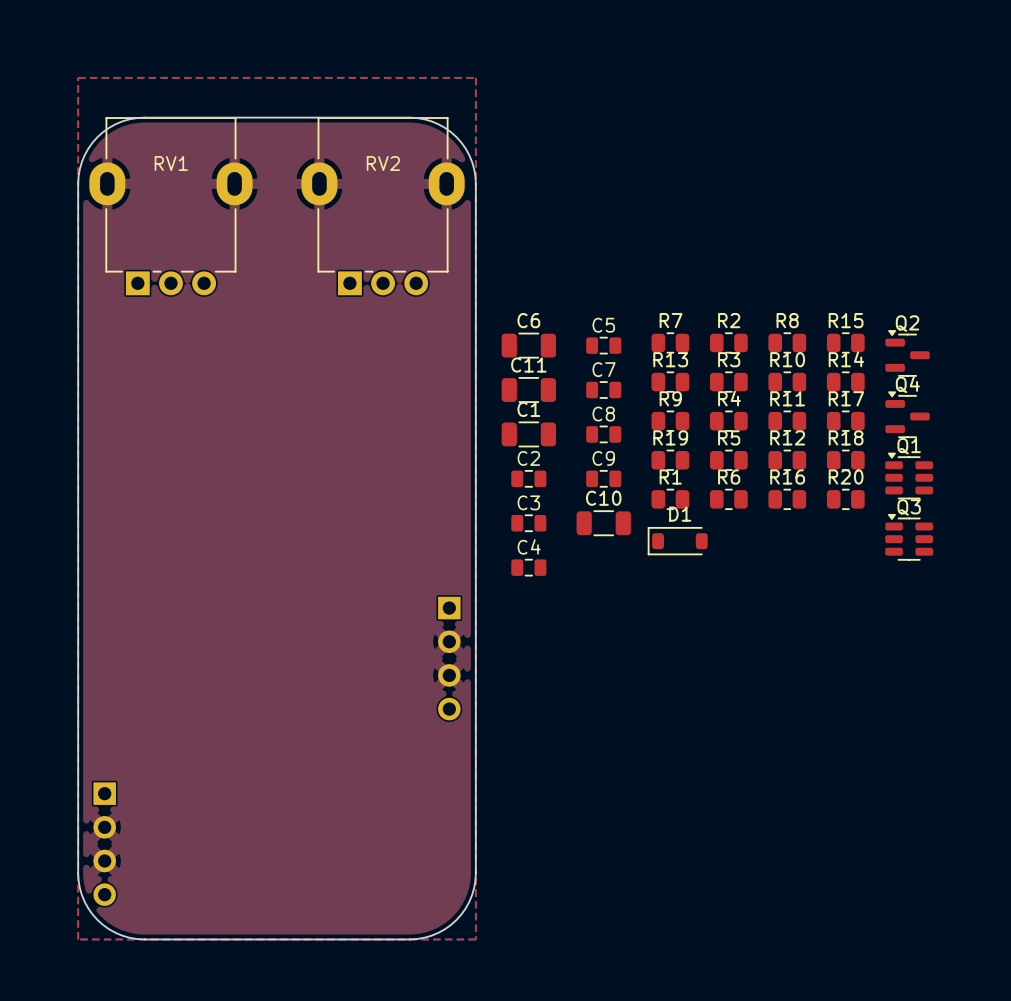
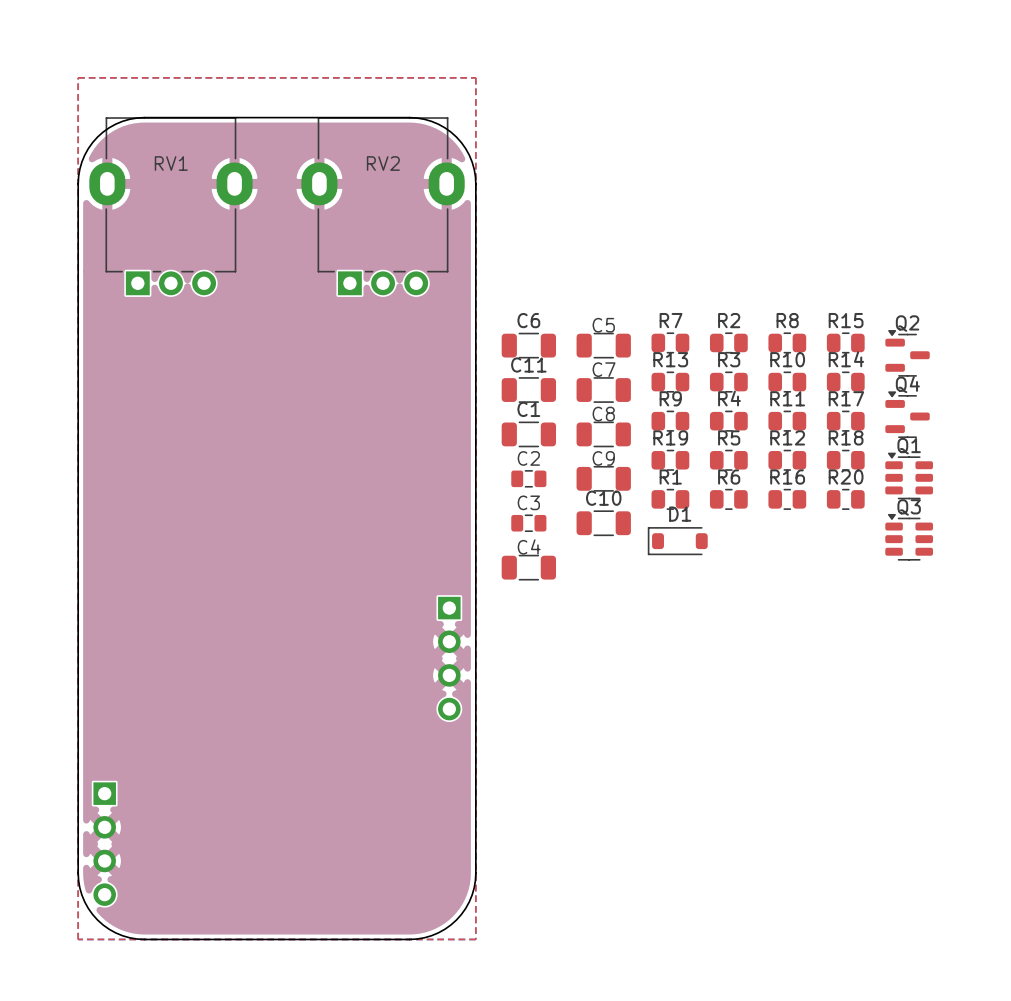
C5 footprint: [586, 336, 622, 355] -> [576, 332, 631, 359]
C7 footprint: [586, 381, 622, 399] -> [576, 377, 631, 403]
C8 footprint: [586, 425, 622, 444] -> [576, 421, 631, 448]
C9 footprint: [586, 470, 622, 488] -> [576, 465, 631, 492]
C4 footprint: [511, 558, 547, 577] -> [501, 554, 557, 581]

